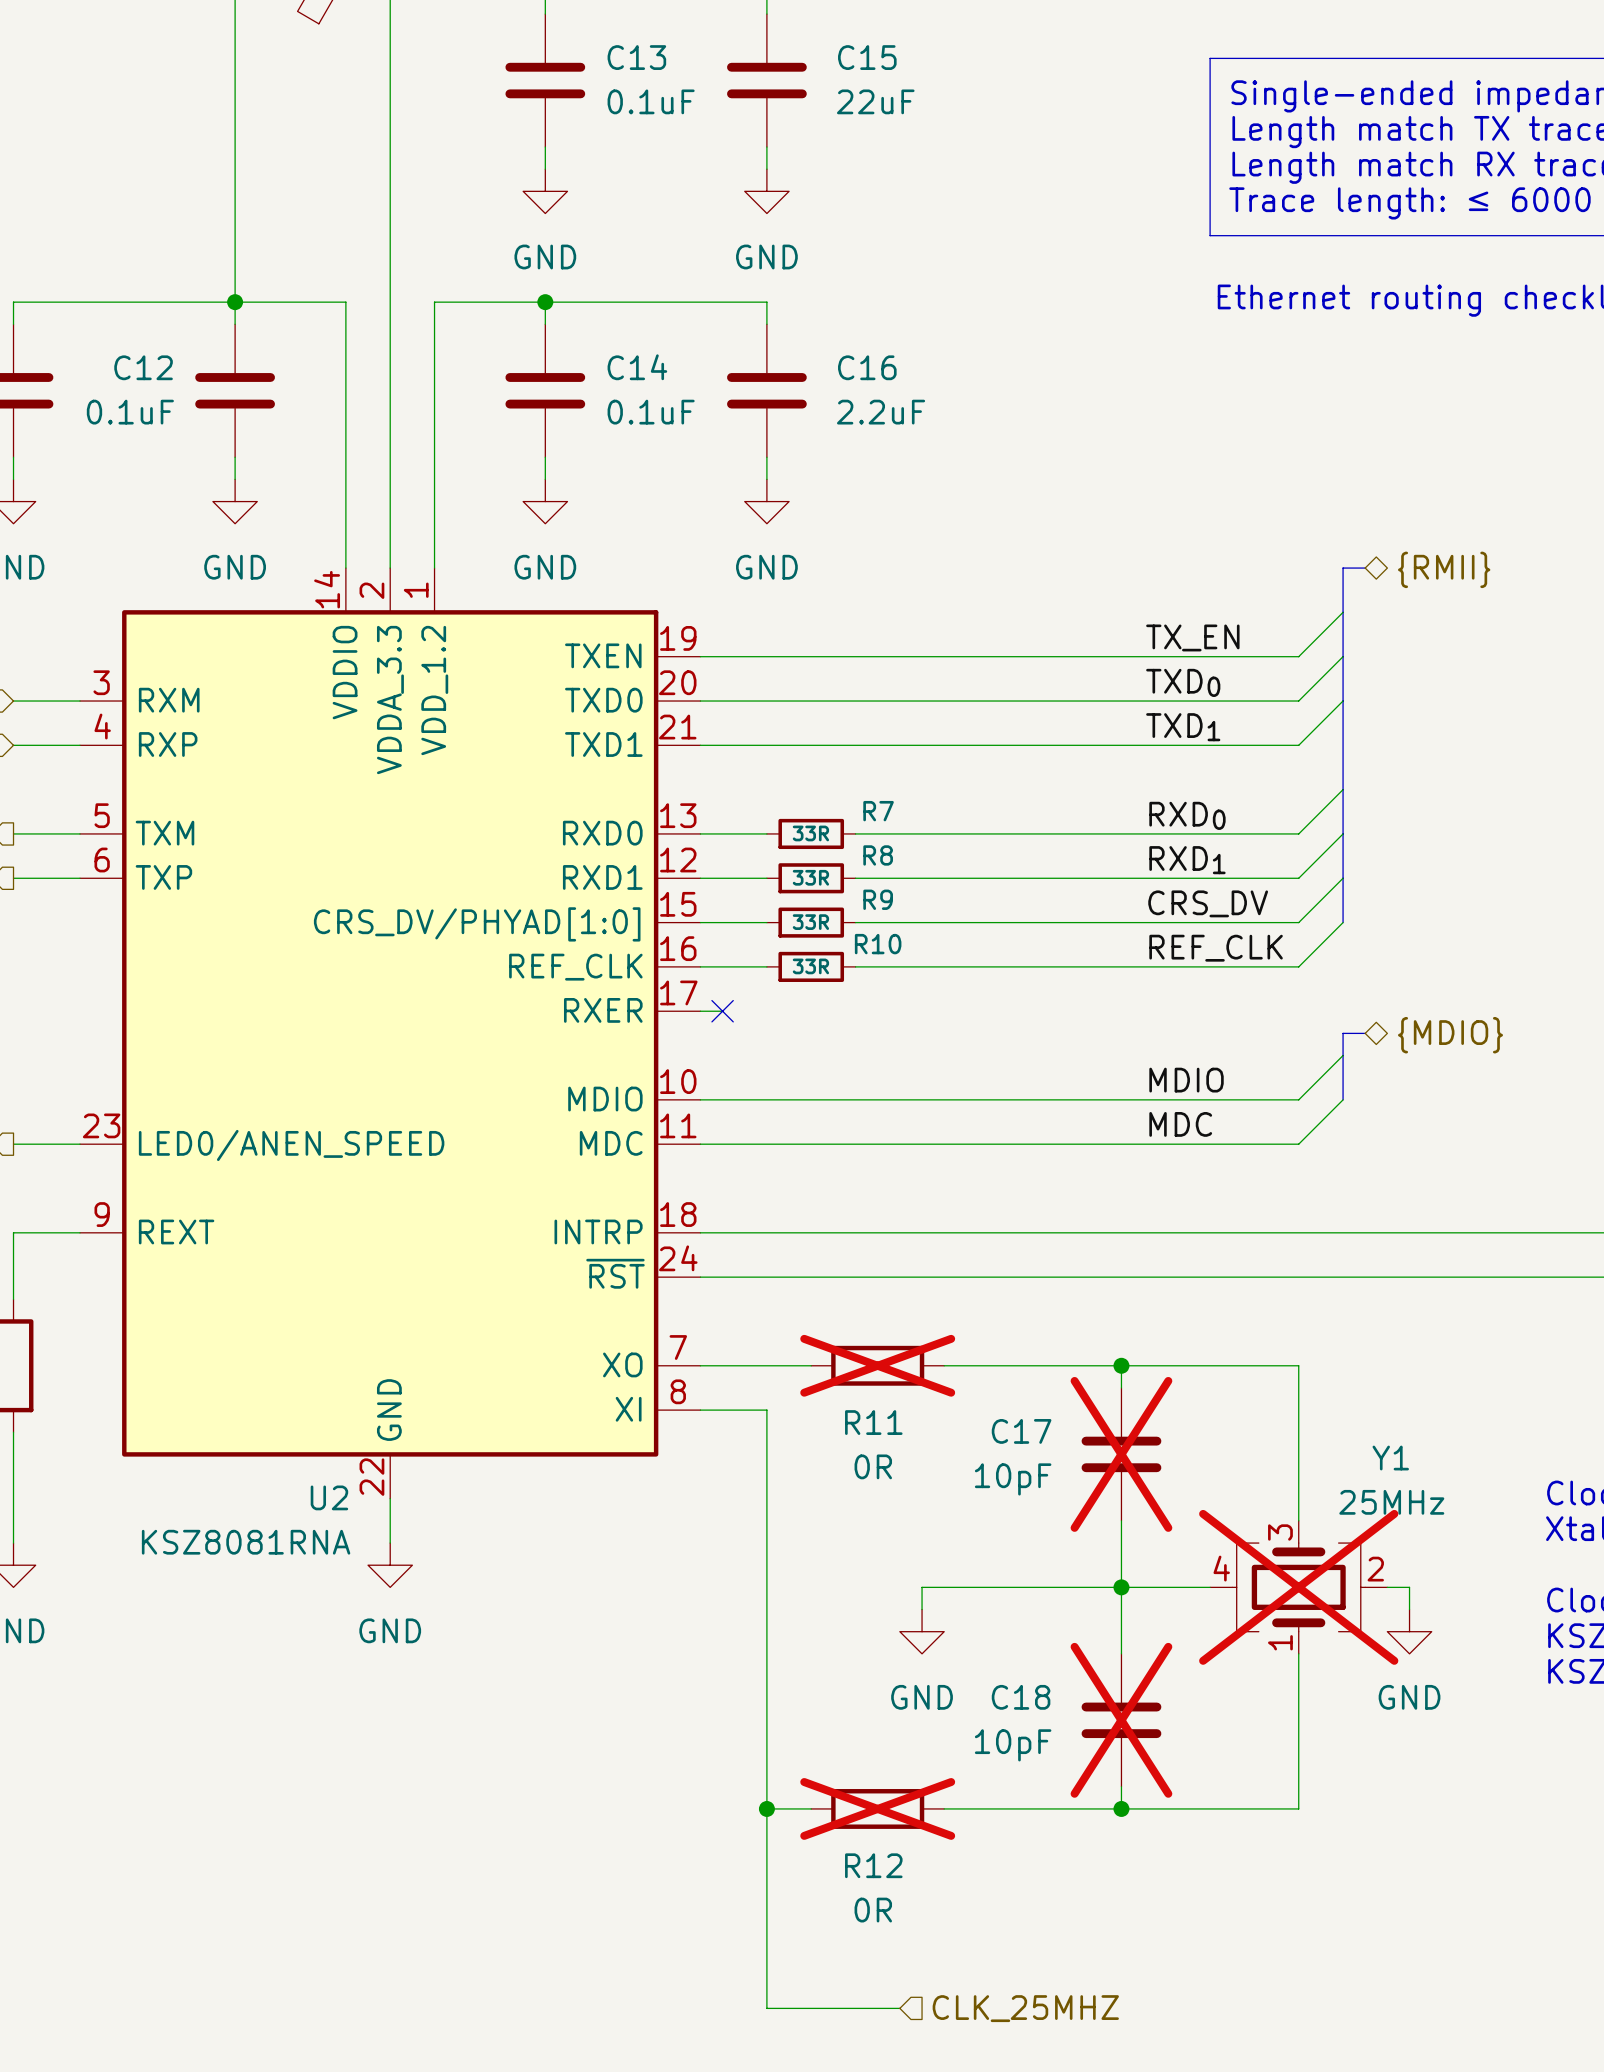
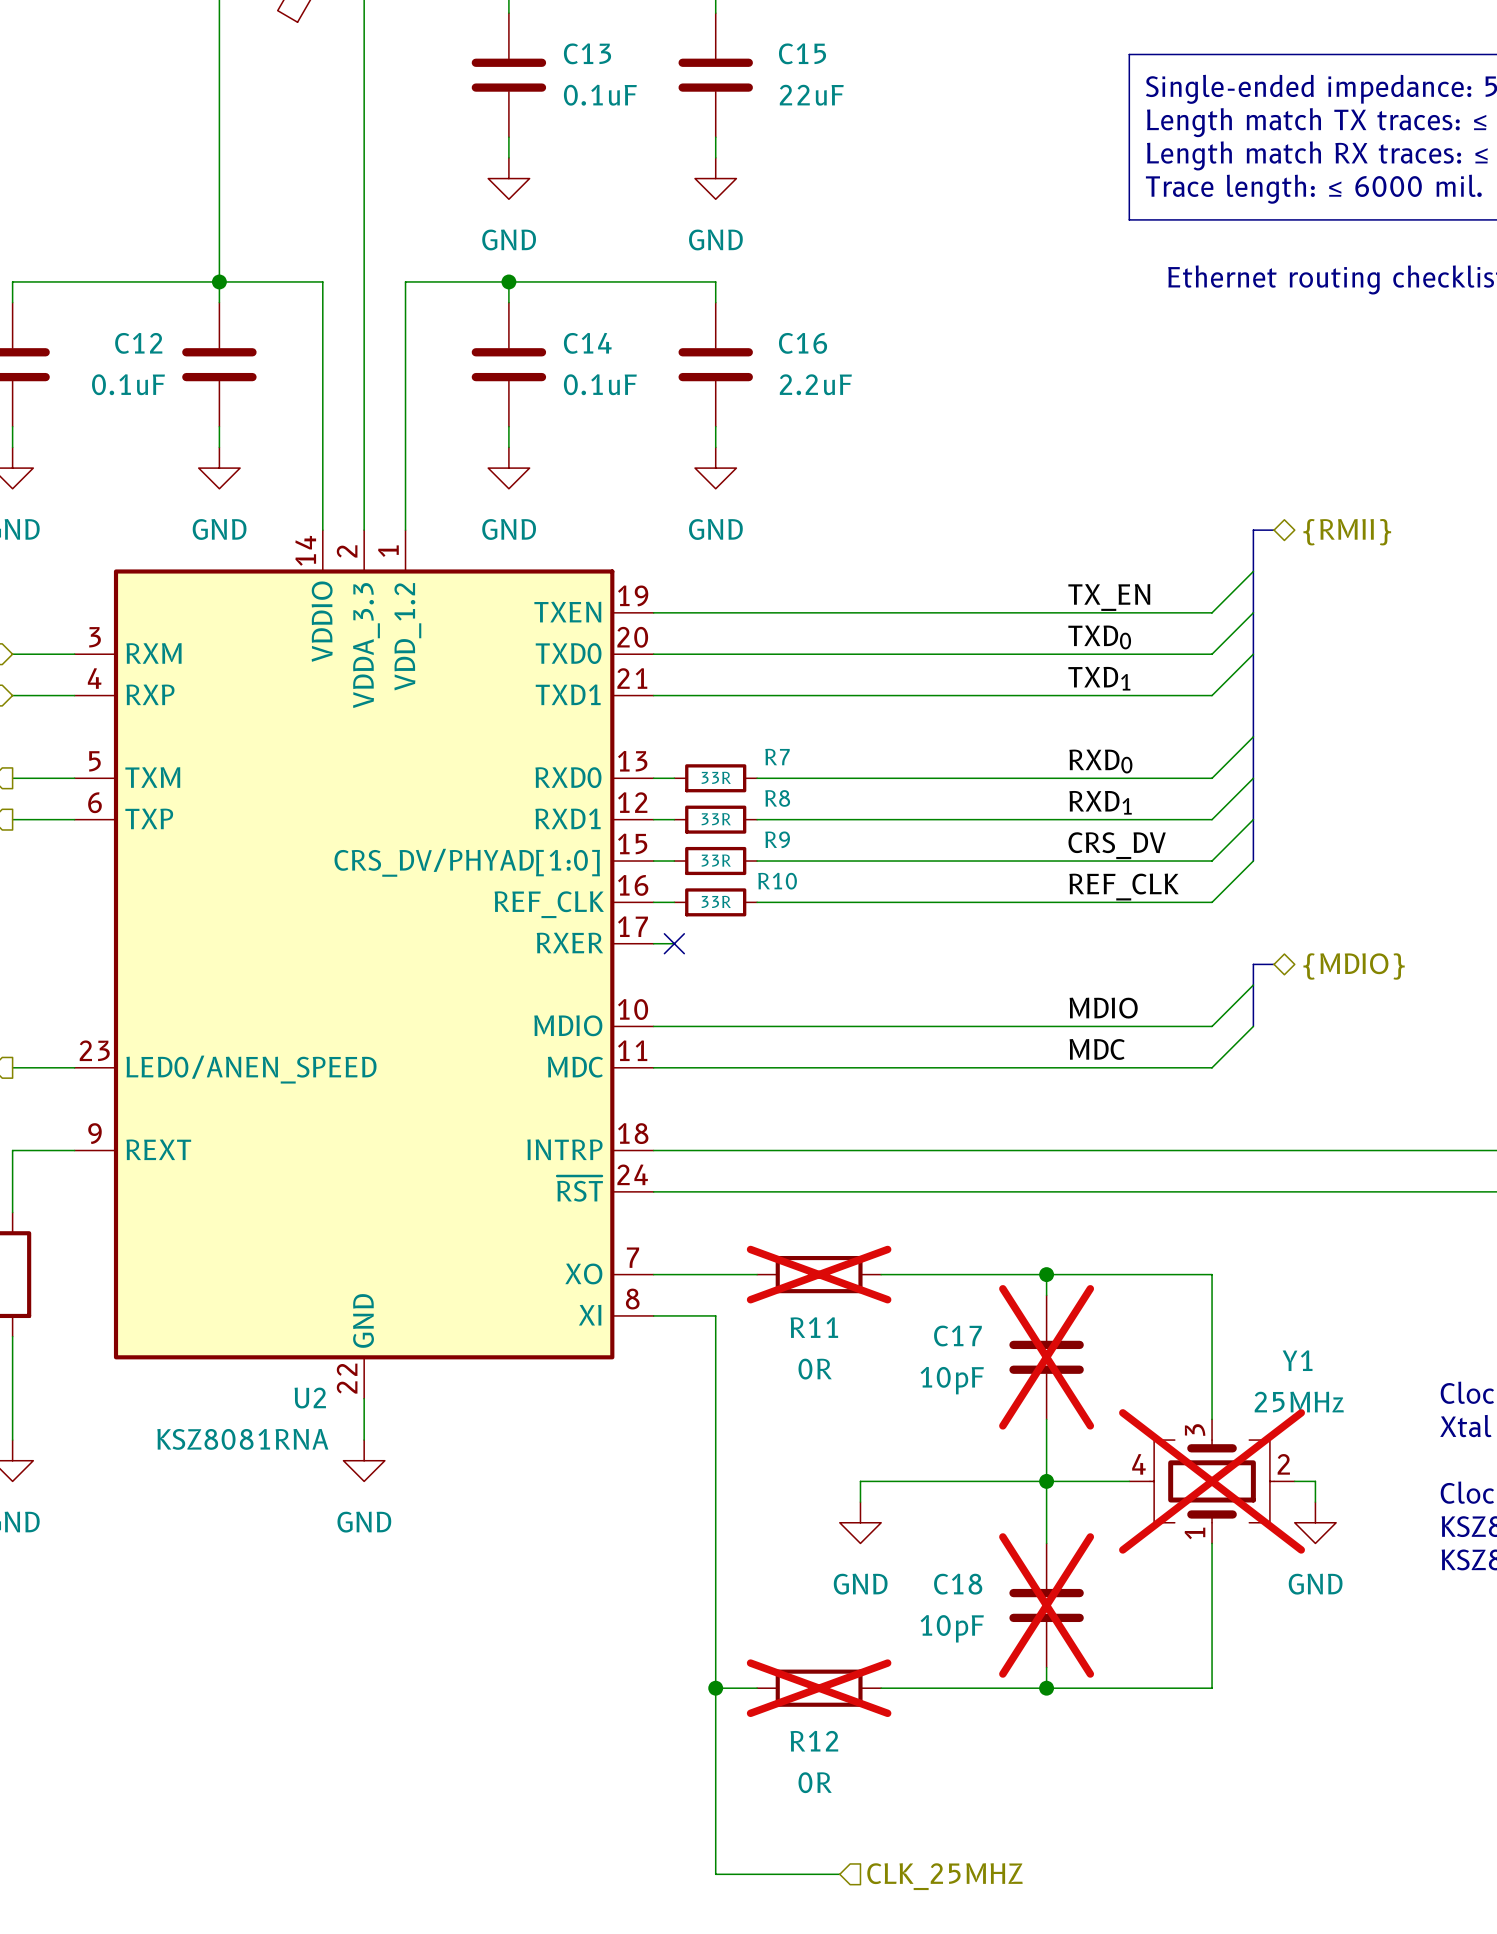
wire: (722, 833) (766, 833) -> (757, 778) (798, 778)
R7 position: (811, 833) -> (715, 778)
wire: (722, 878) (766, 878) -> (757, 819) (798, 819)
R8 position: (811, 878) -> (715, 819)
wire: (722, 922) (766, 922) -> (757, 861) (798, 861)
R9 position: (811, 922) -> (715, 861)
wire: (722, 966) (766, 966) -> (757, 902) (798, 902)
R10 position: (811, 966) -> (715, 902)

